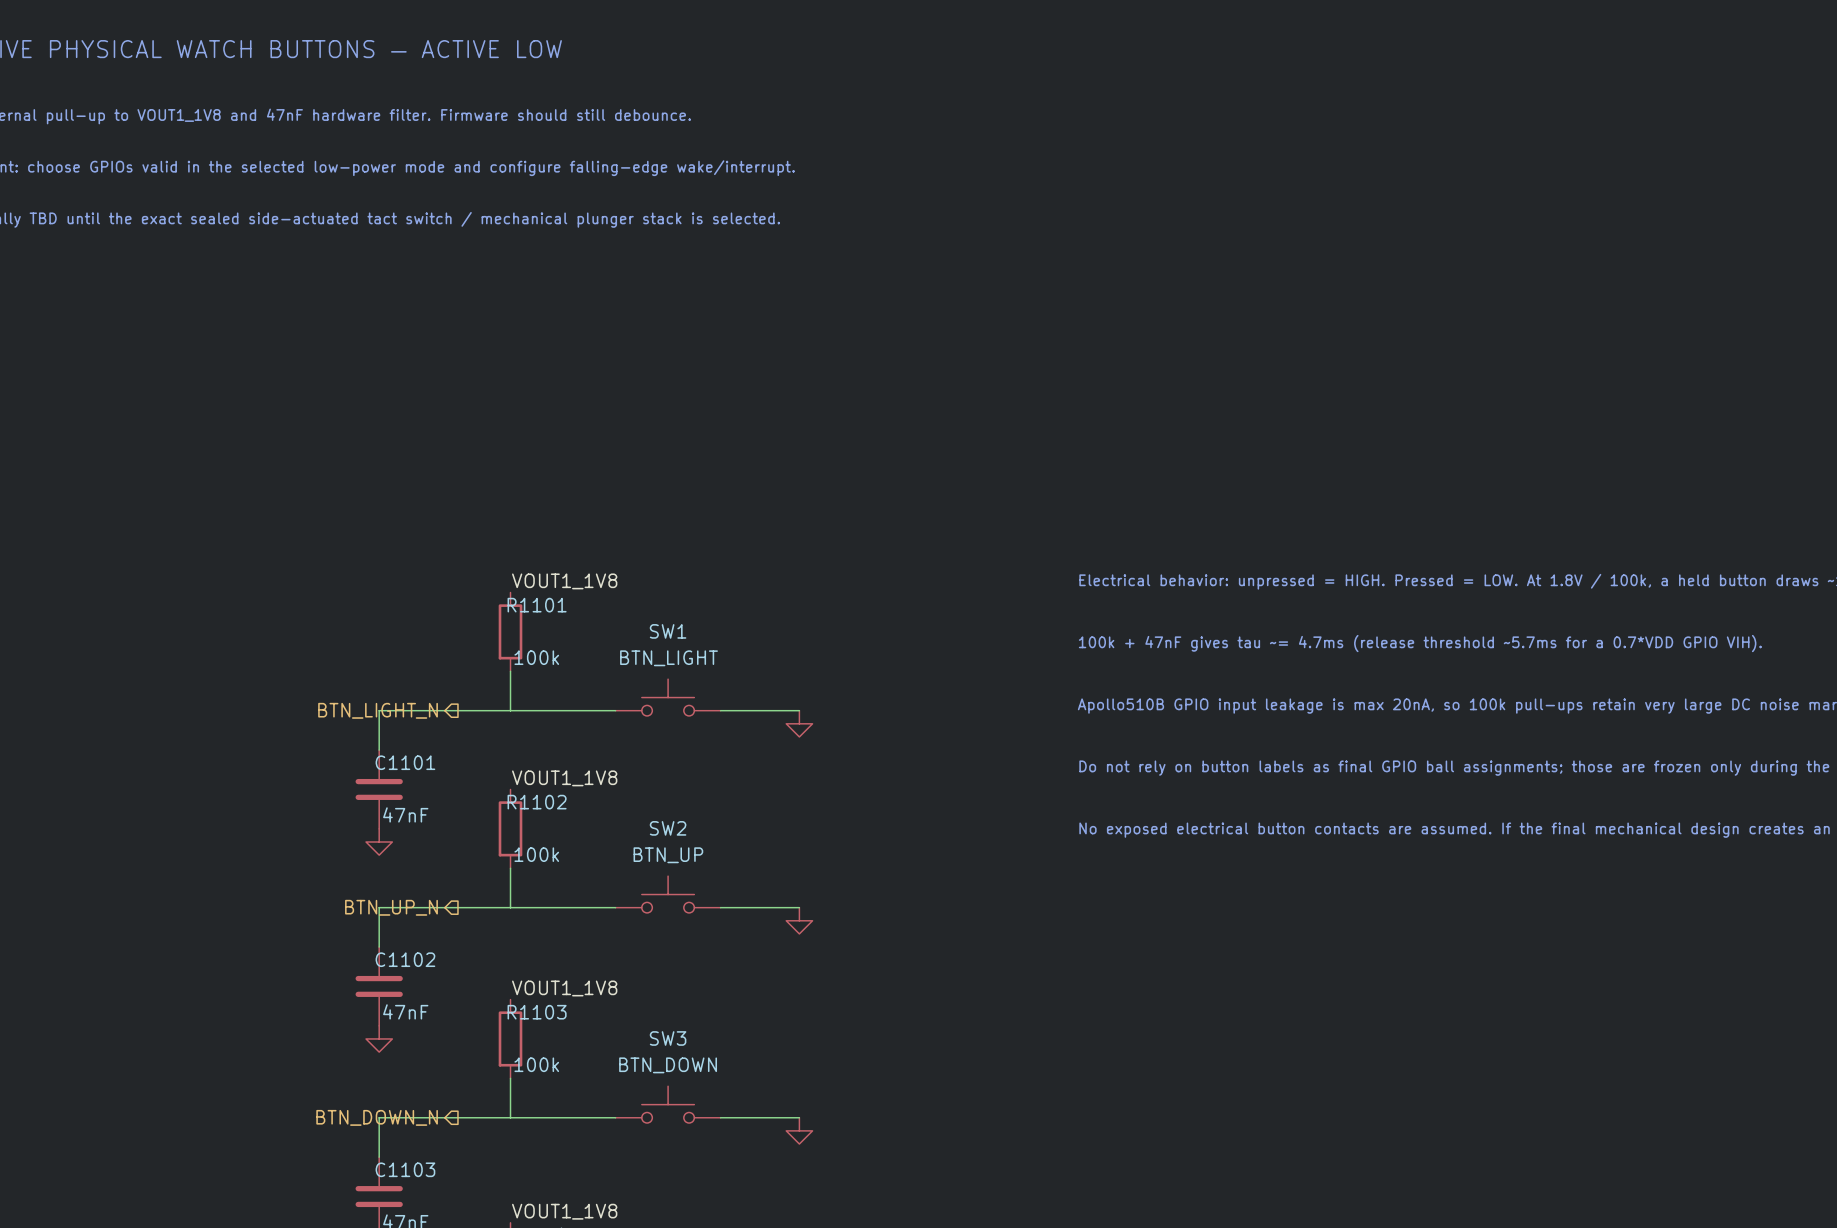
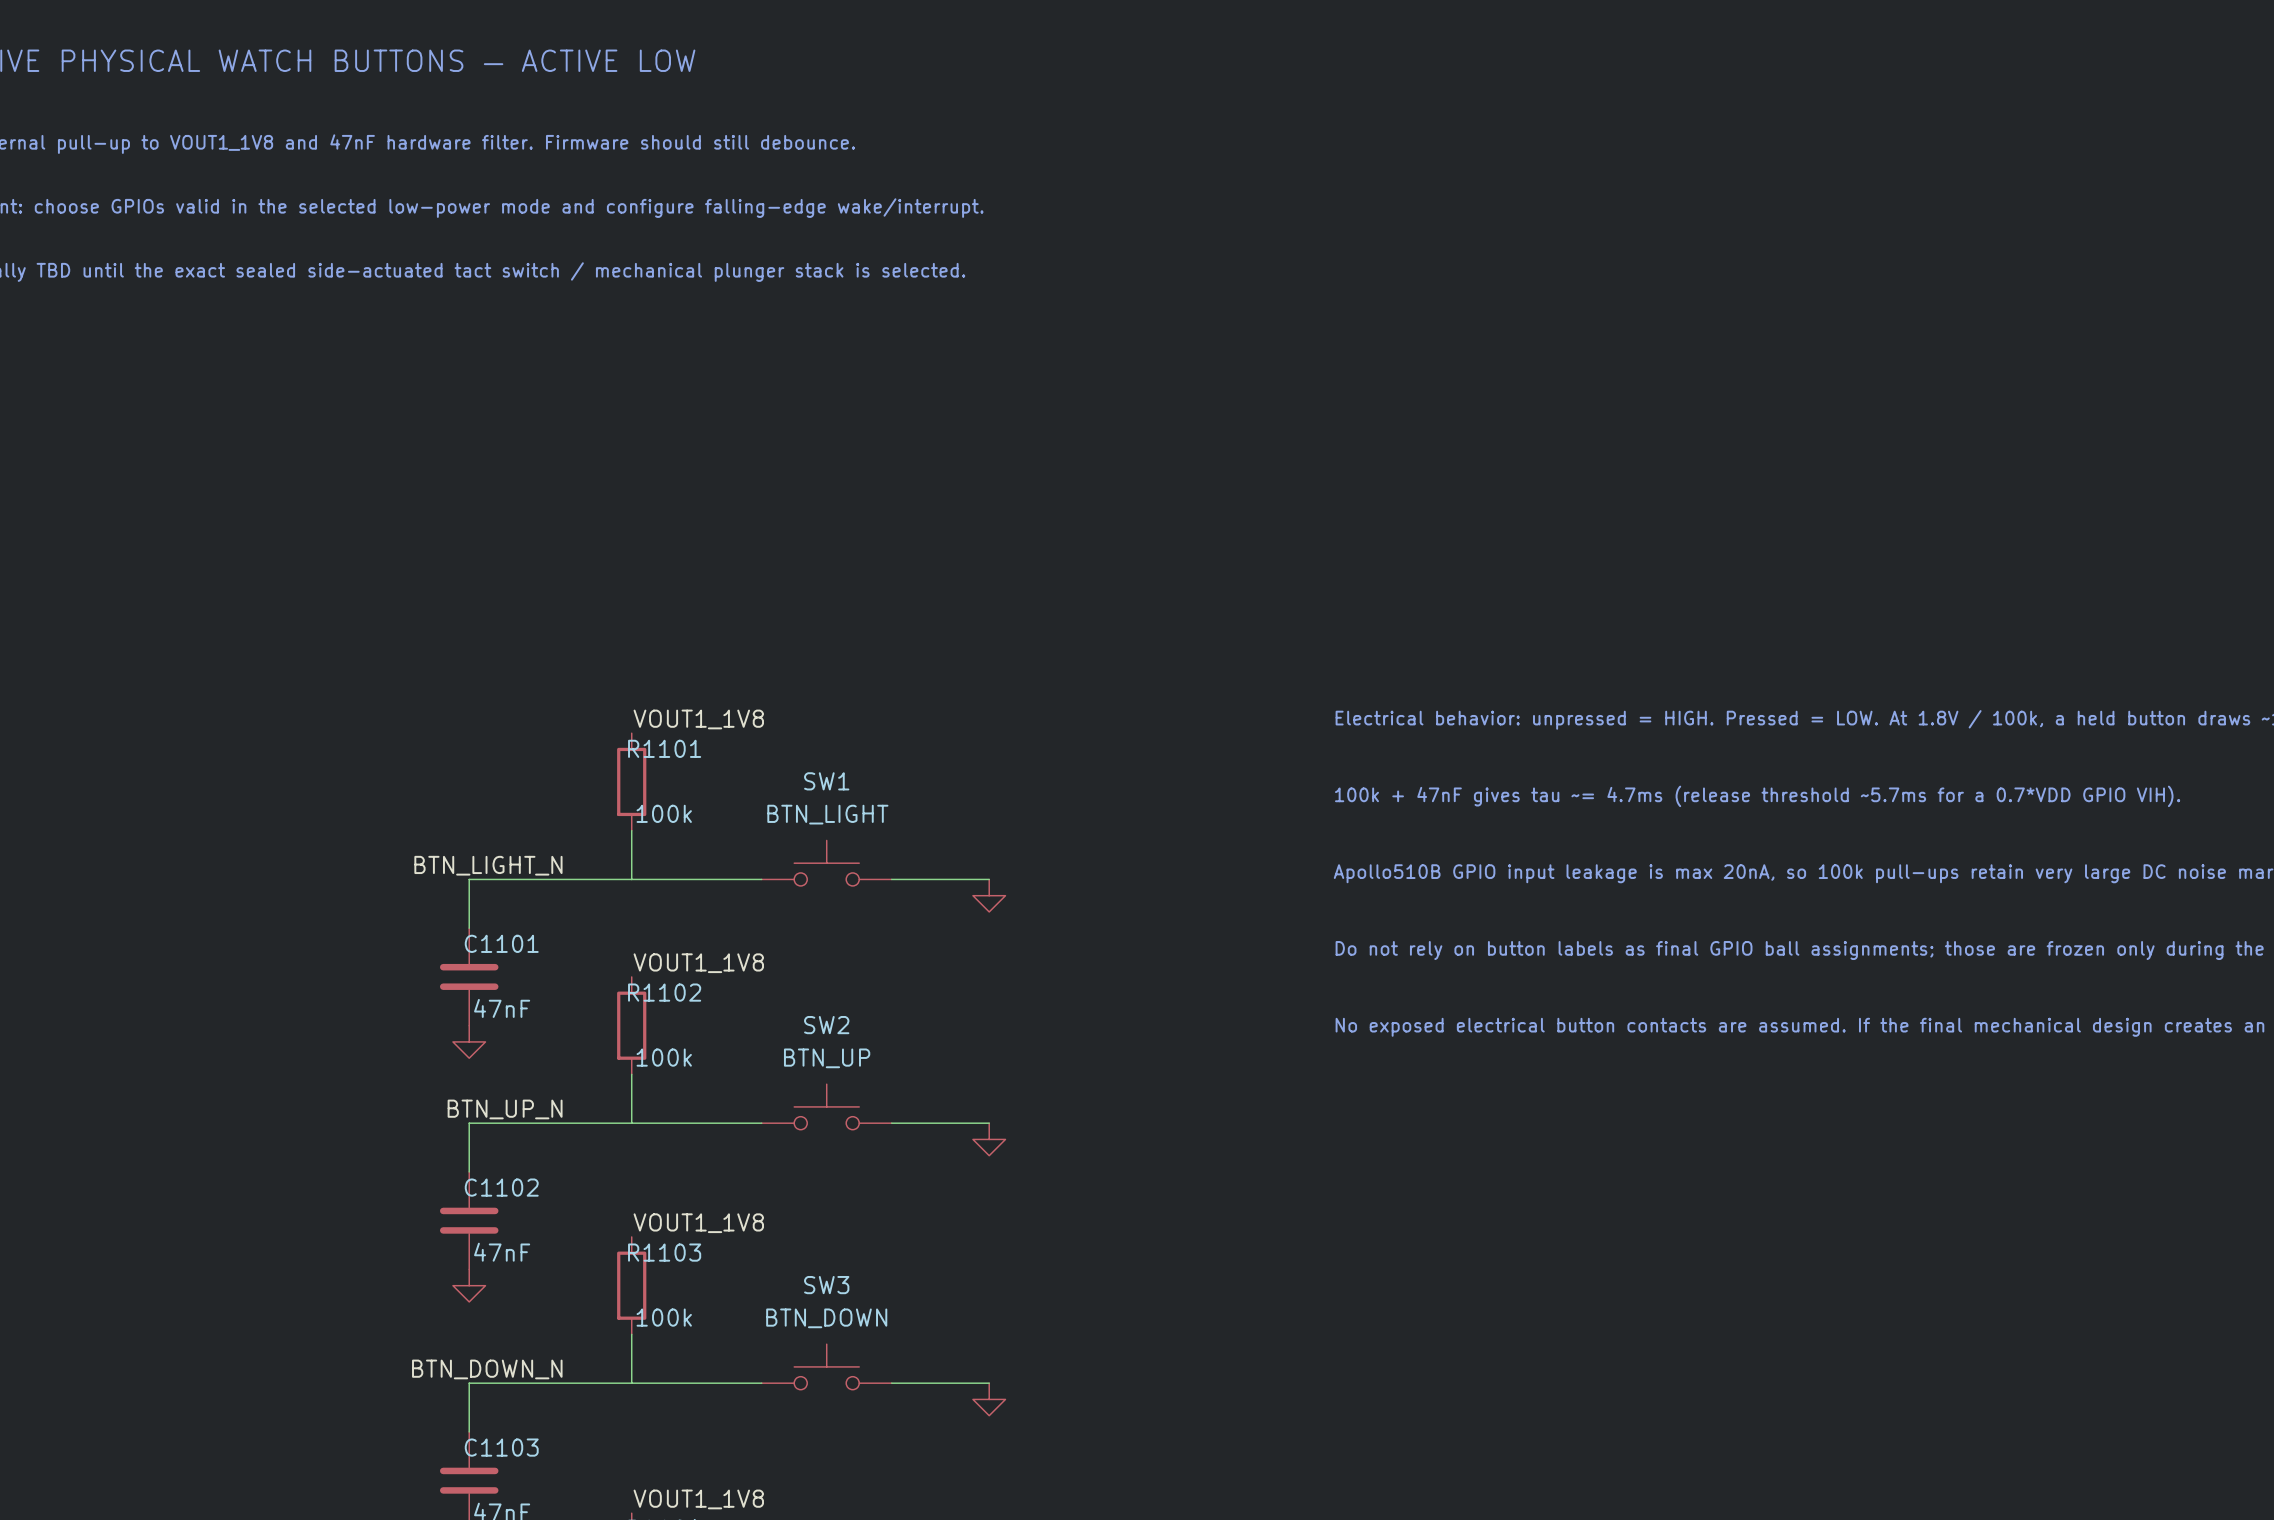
label: none -> BTN_LIGHT_N (488, 865)
hierarchical label: BTN_LIGHT_N (378, 710) -> none
label: none -> BTN_UP_N (505, 1109)
hierarchical label: BTN_UP_N (391, 907) -> none
label: none -> BTN_DOWN_N (487, 1369)
hierarchical label: BTN_DOWN_N (377, 1117) -> none

